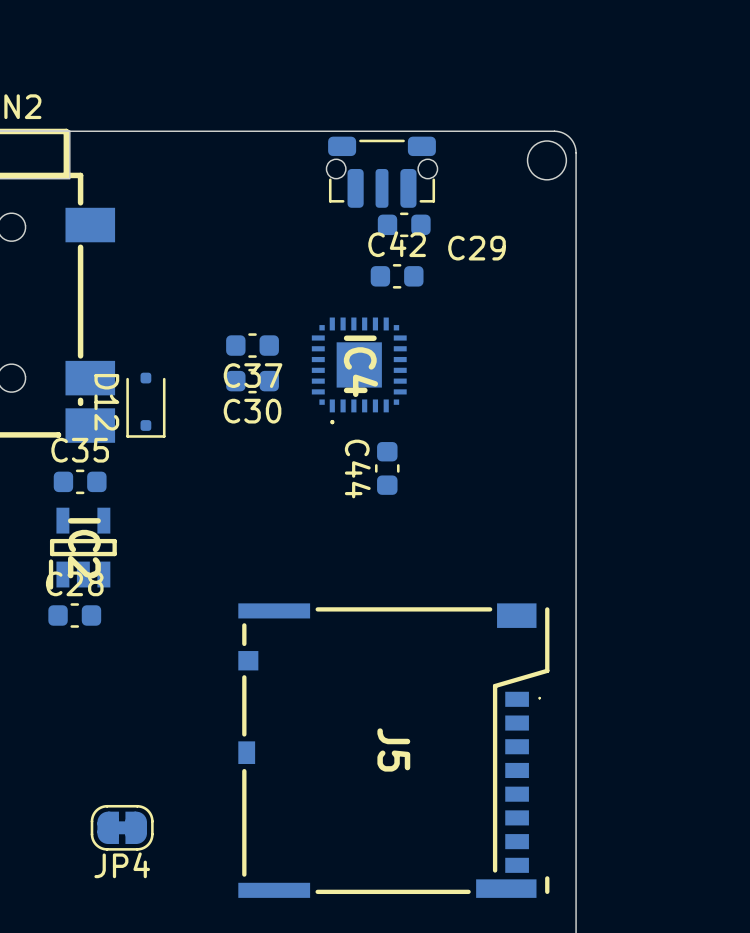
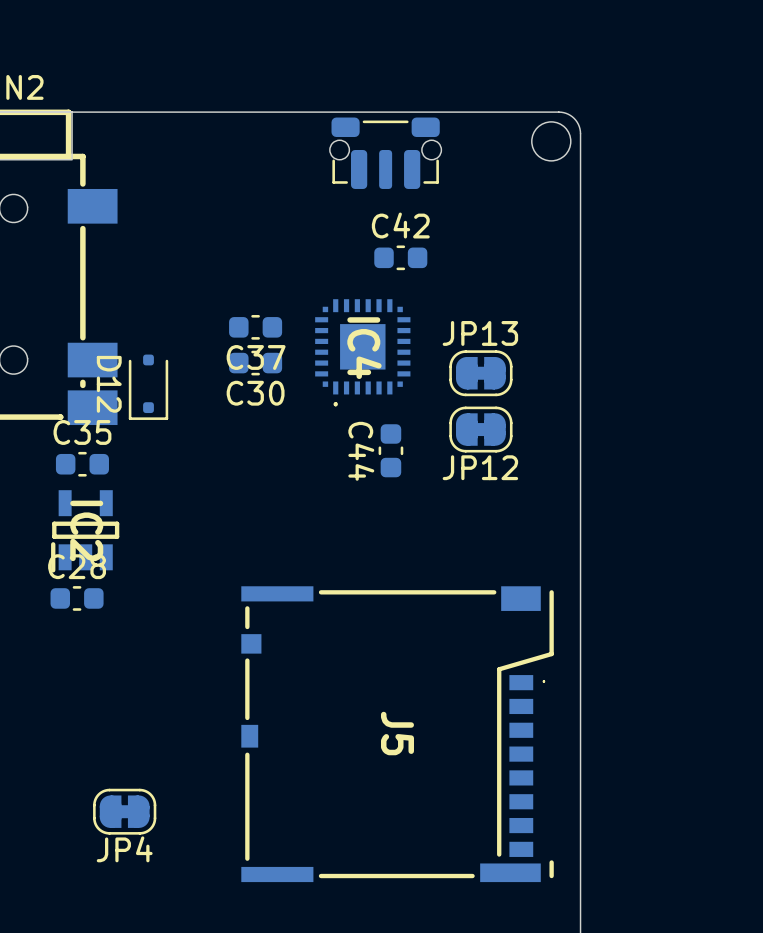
C29: (404, 224) -> none
JP13: none -> (480, 373)
JP12: none -> (480, 429)

